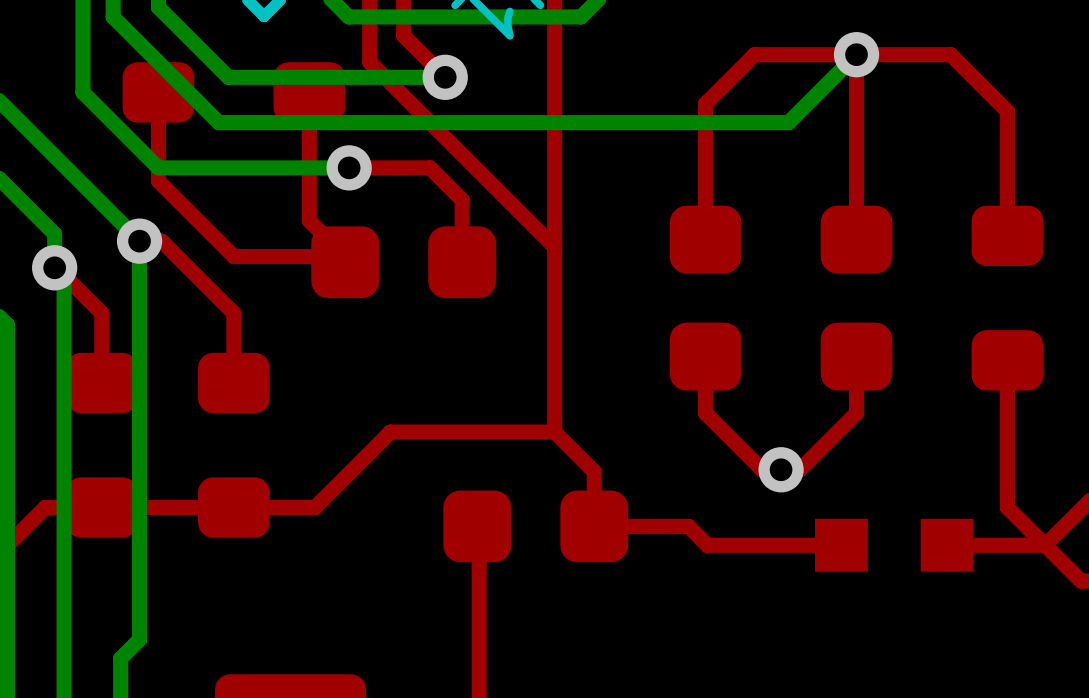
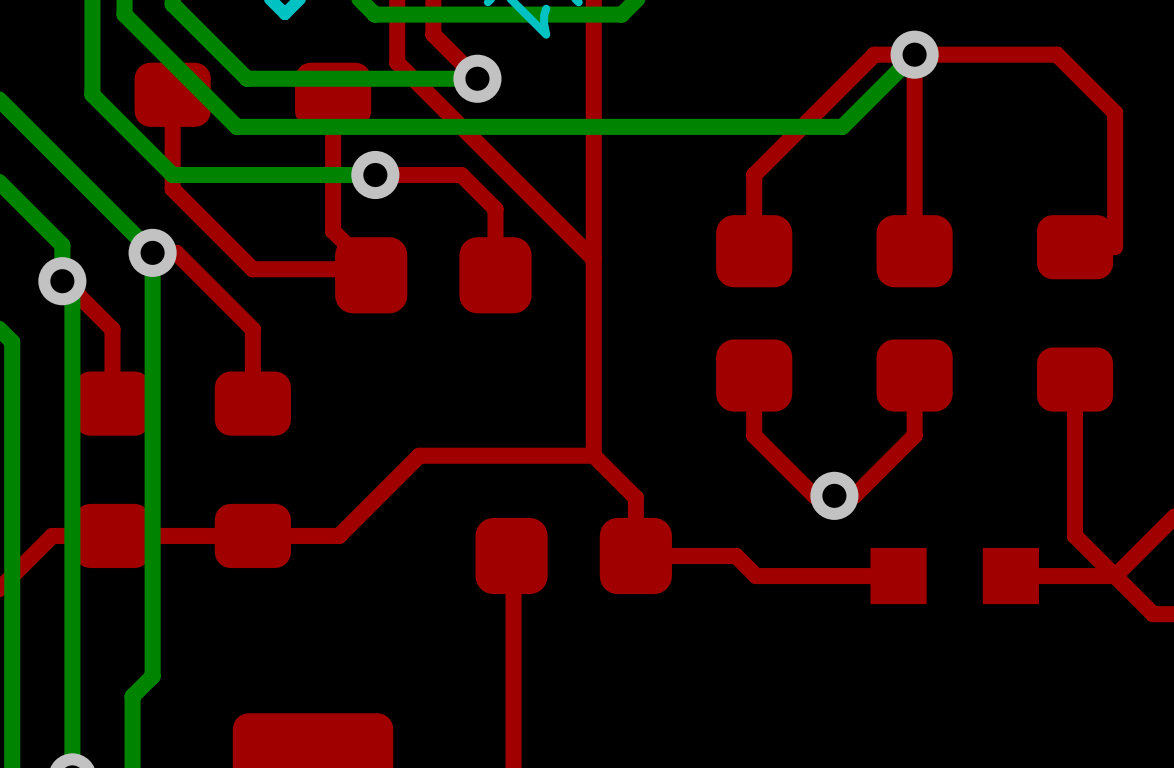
top track: (818, 54) (754, 54) (705, 103) (705, 167) -> (874, 54) (754, 175)
top track: (950, 54) (1007, 111) (1007, 235) -> (1014, 54) (1056, 54) (1115, 112) (1115, 247)

